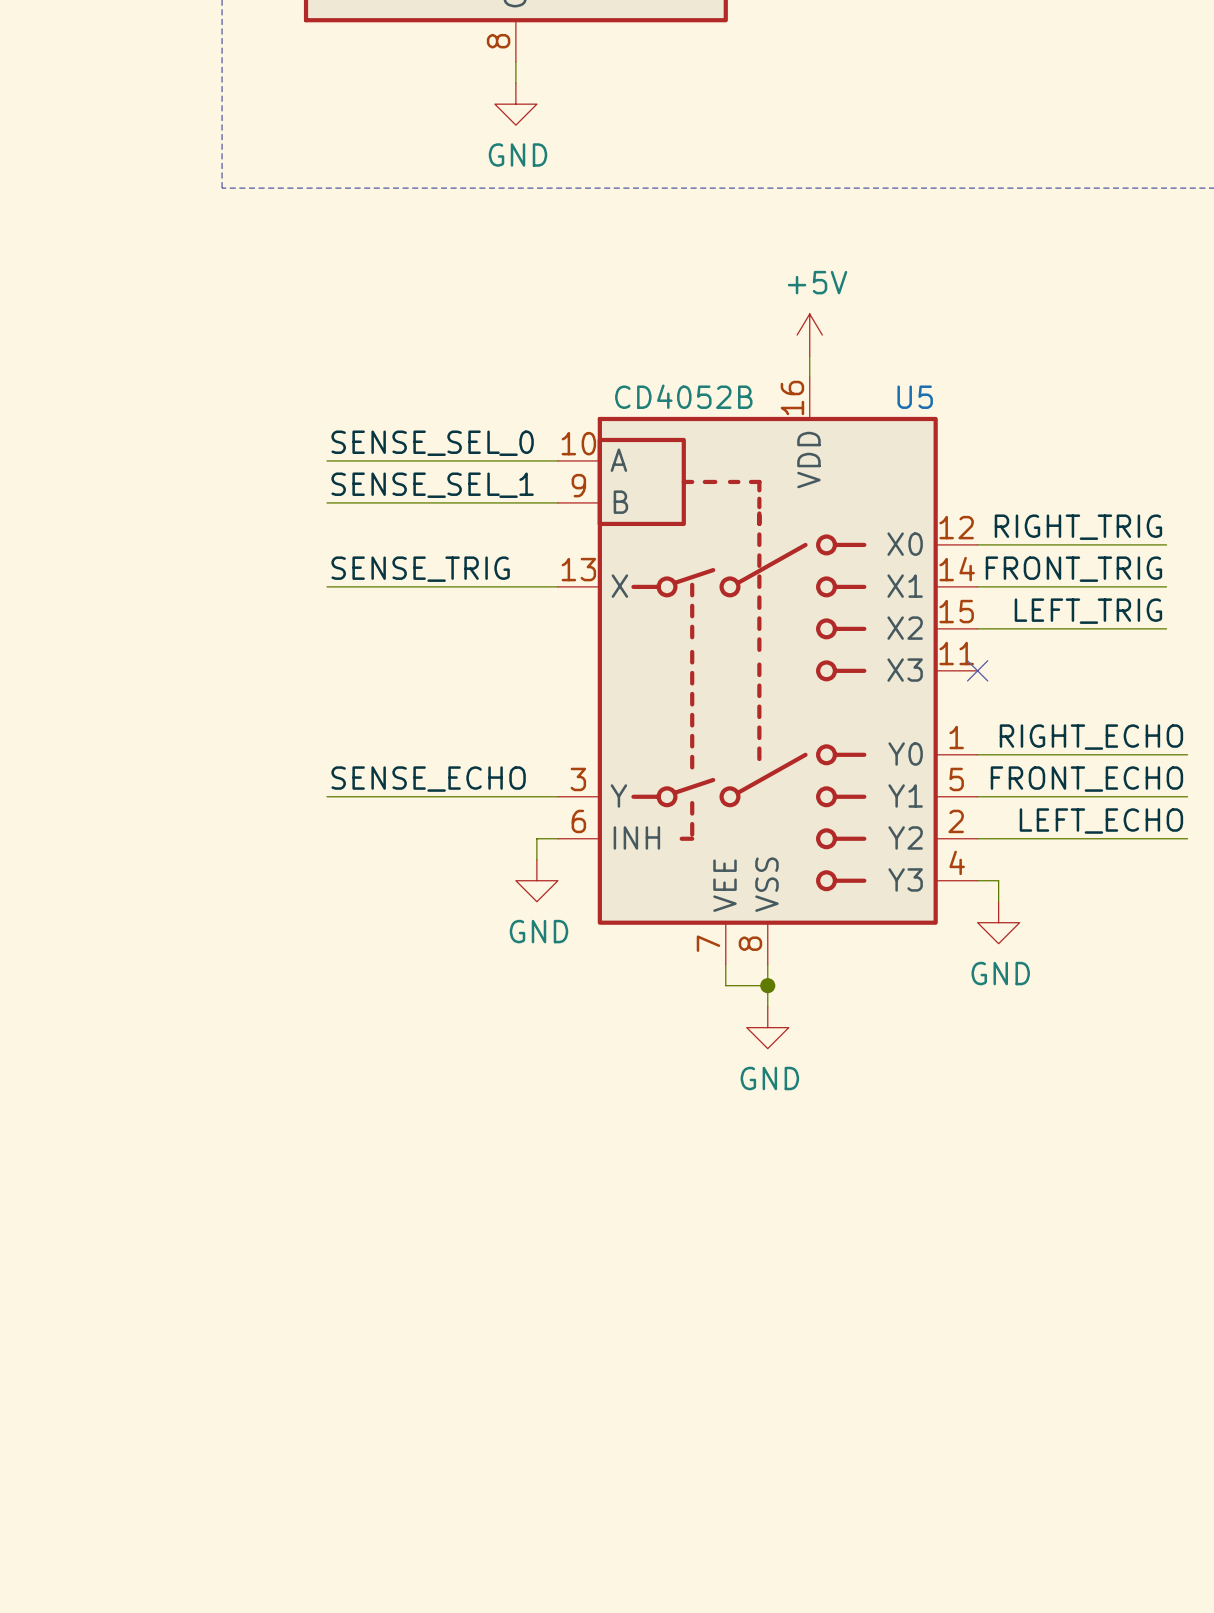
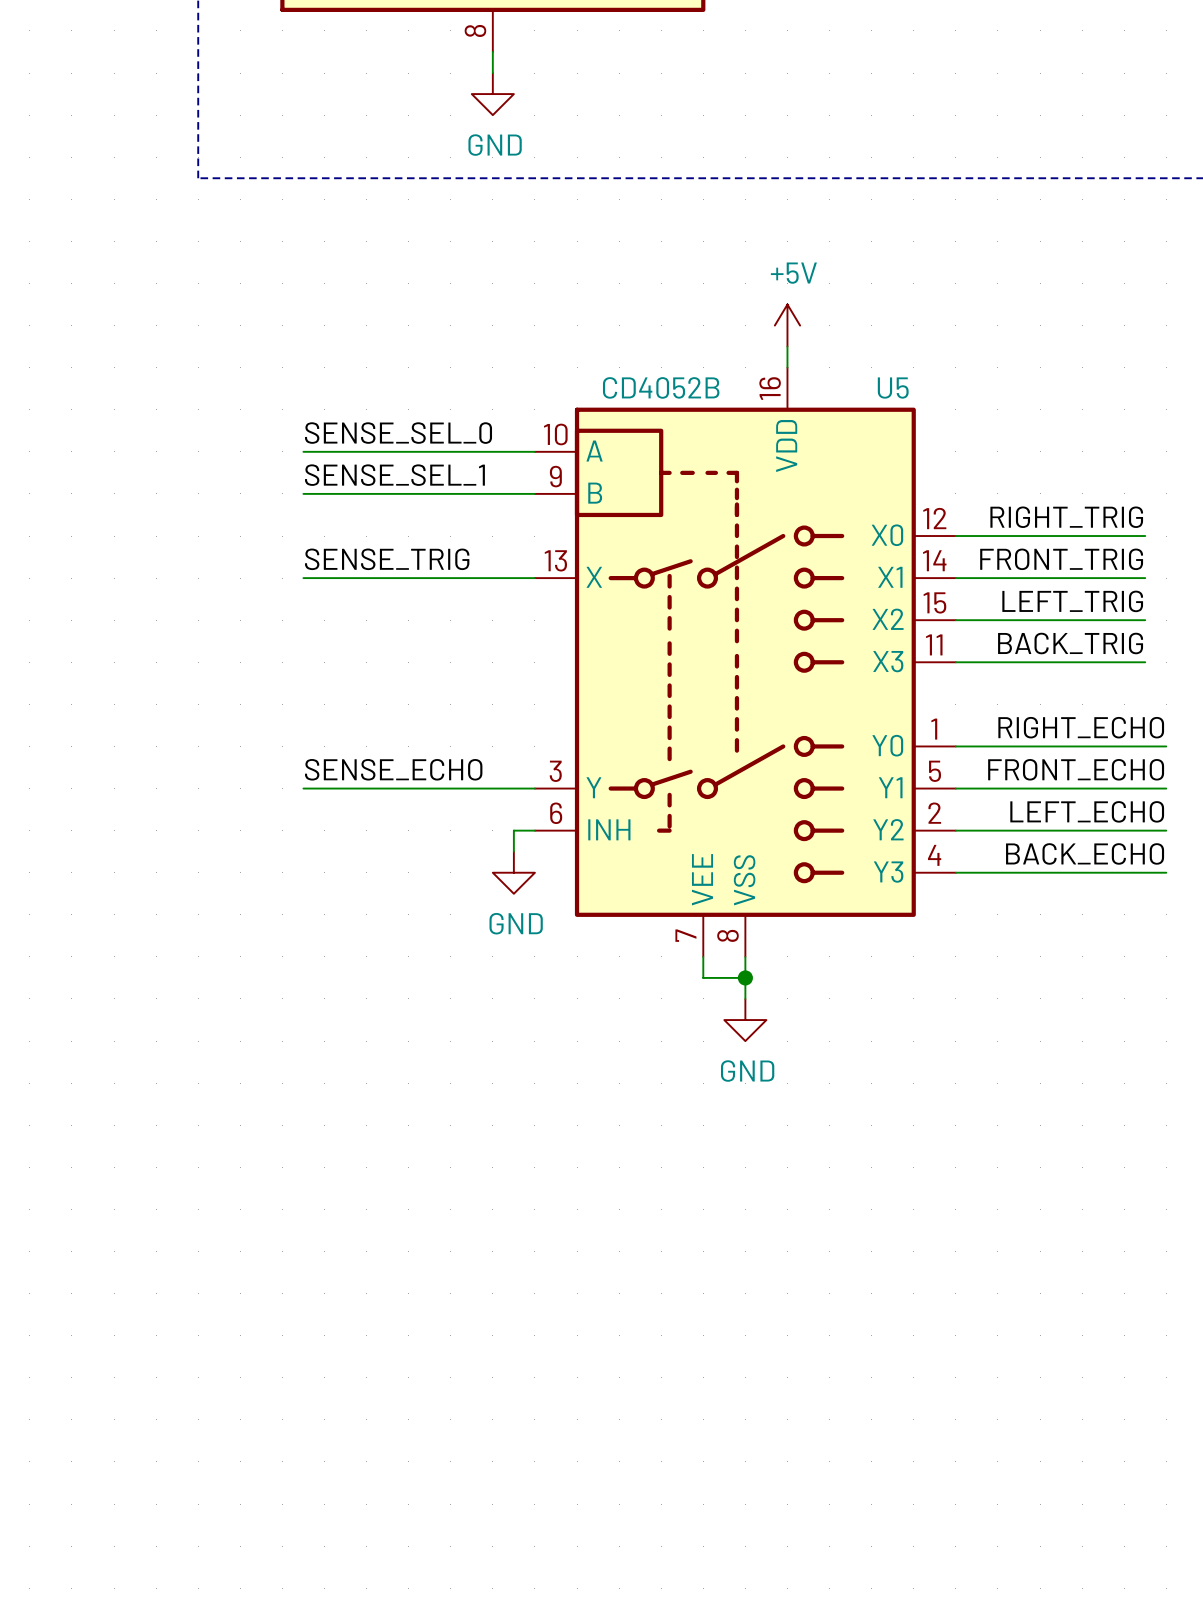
label: none -> BACK_TRIG (1070, 643)
wire: none -> (955, 662) (1145, 662)
no-connect mark: (977, 670) -> none
label: none -> BACK_ECHO (1085, 853)
wire: (998, 880) (998, 901) -> (976, 872) (1166, 872)
power symbol: GND (998, 922) -> none

